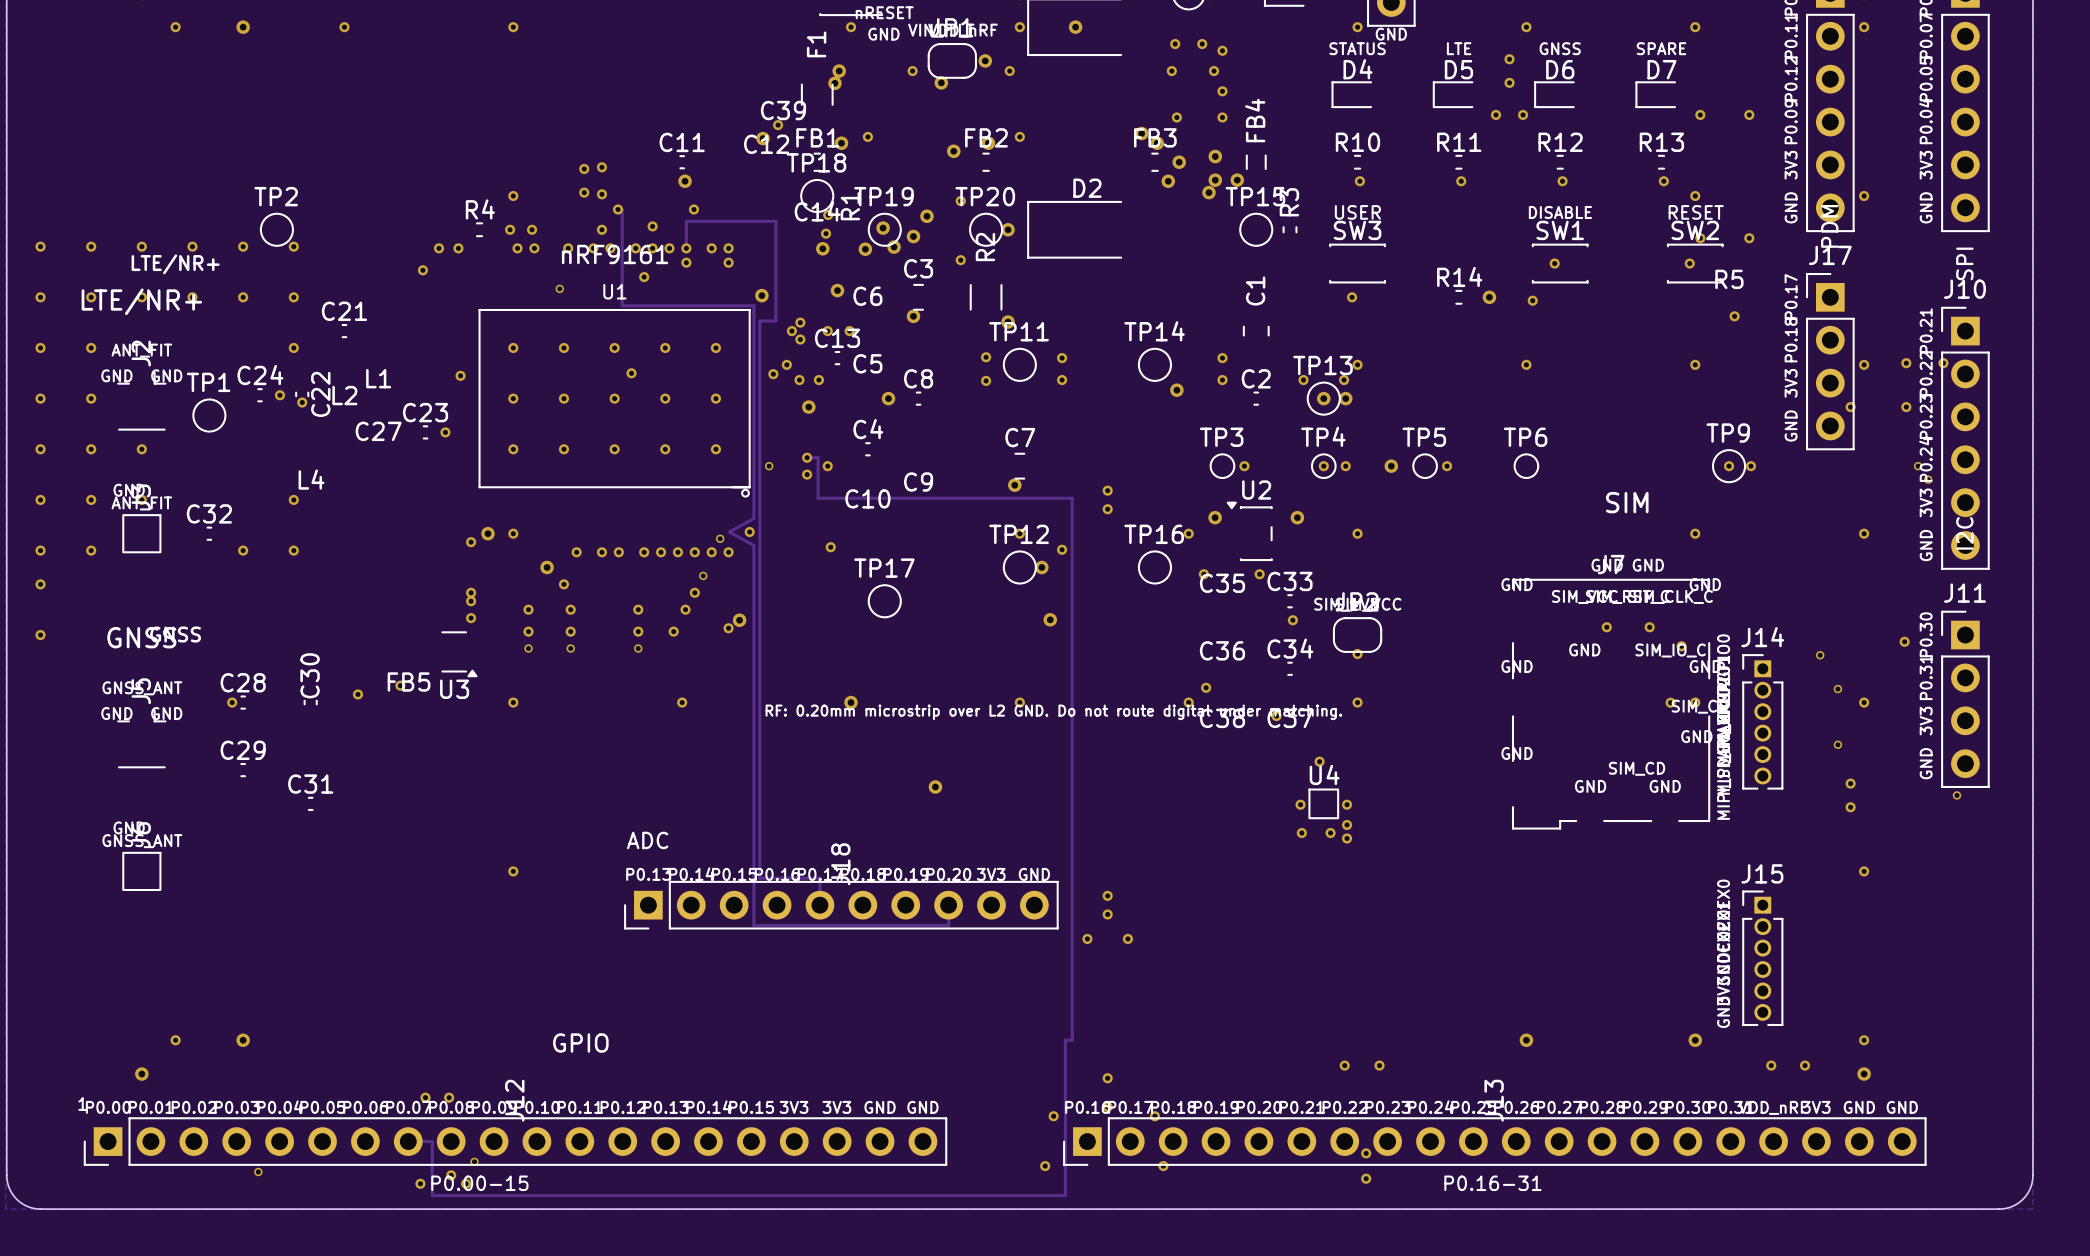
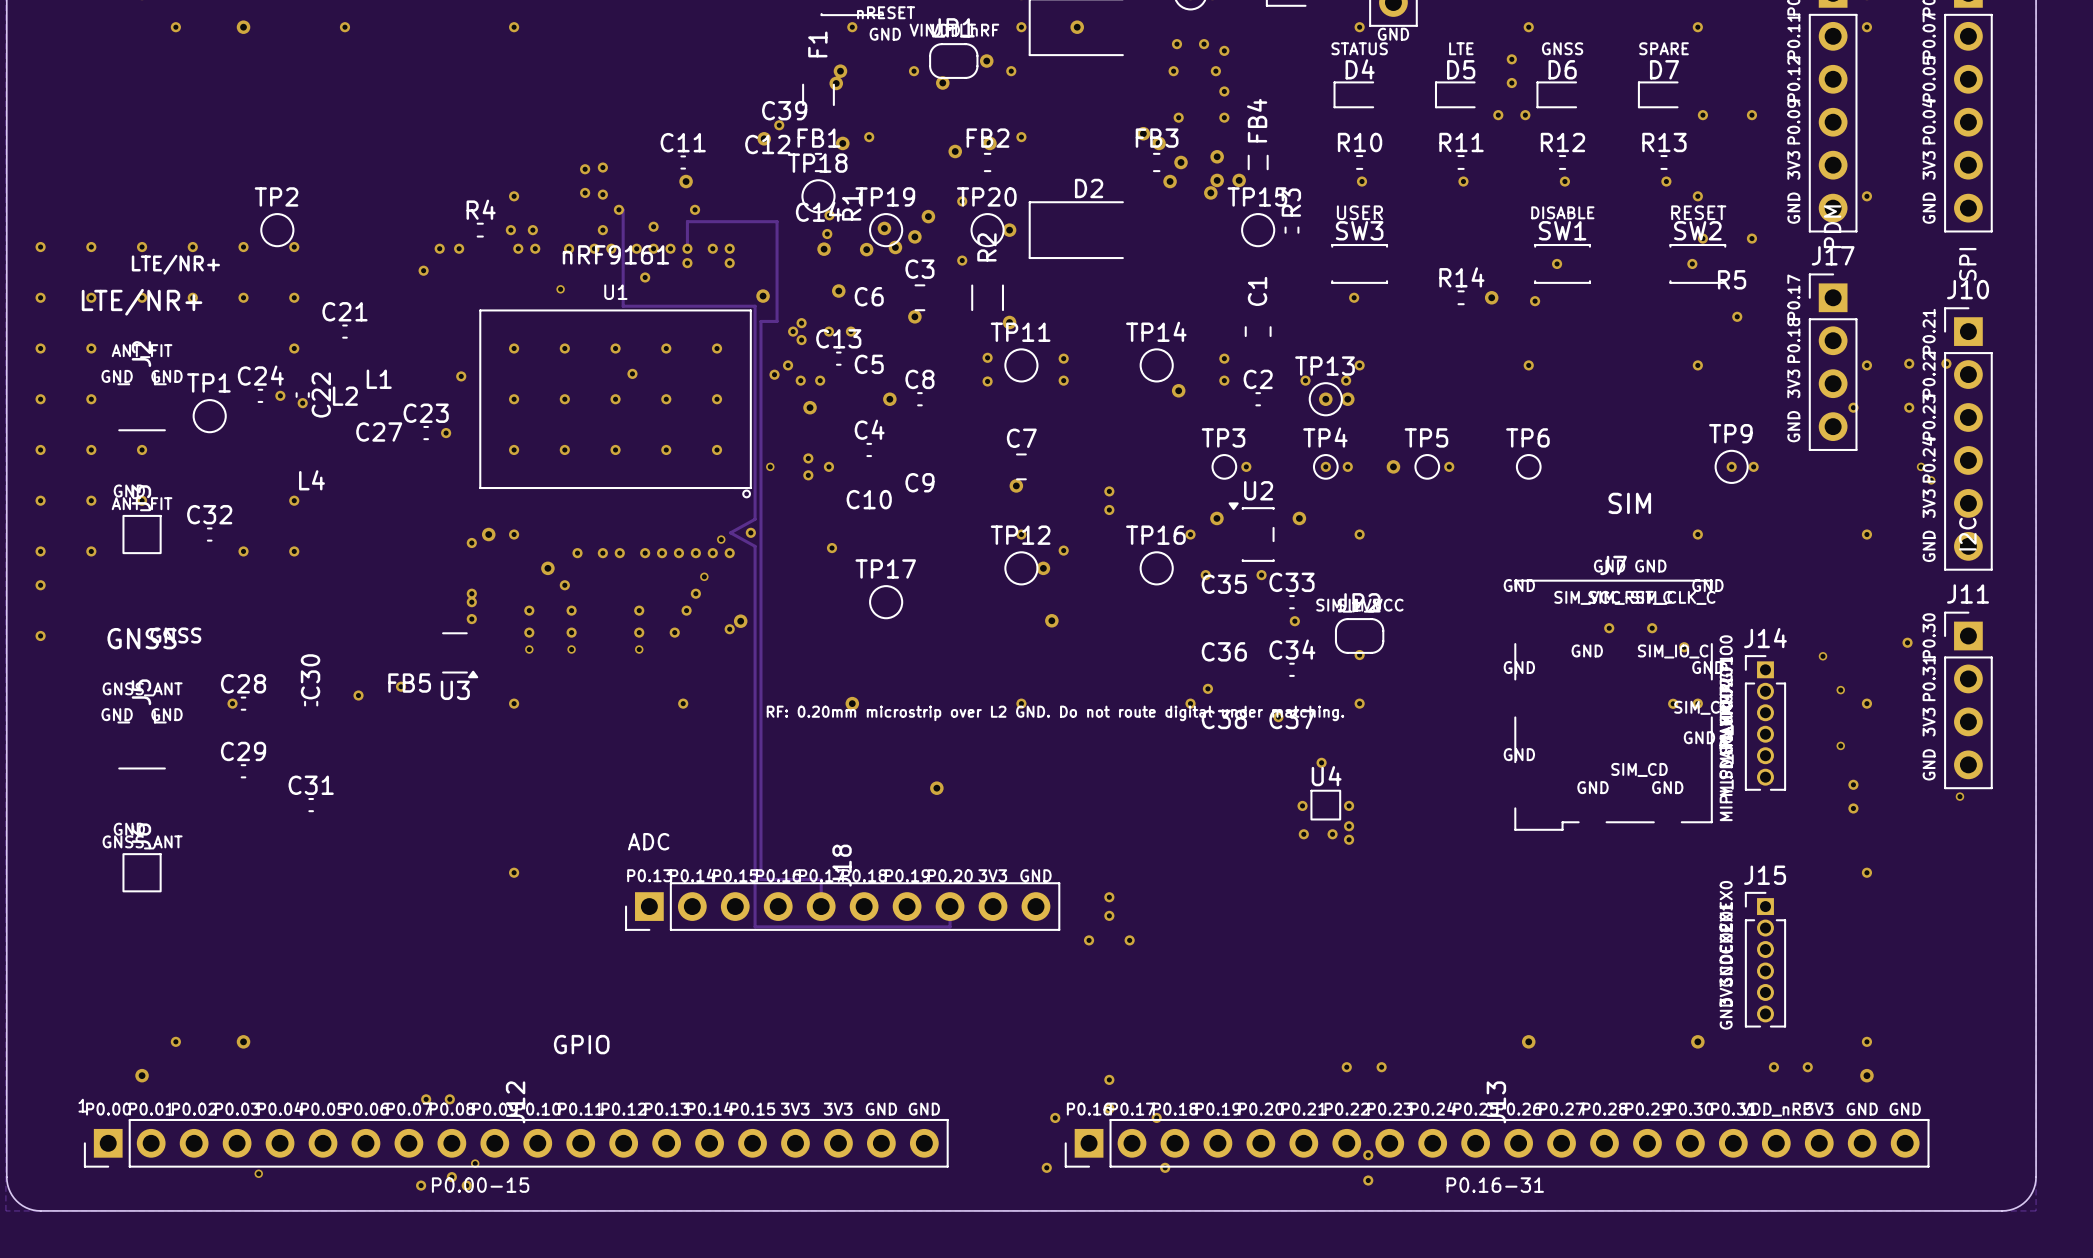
track: (807, 457) (818, 457) (818, 498) (1072, 498) (1072, 1040) (1065, 1040) (1065, 1195) (432, 1195) (432, 1141) (408, 1141) -> none

